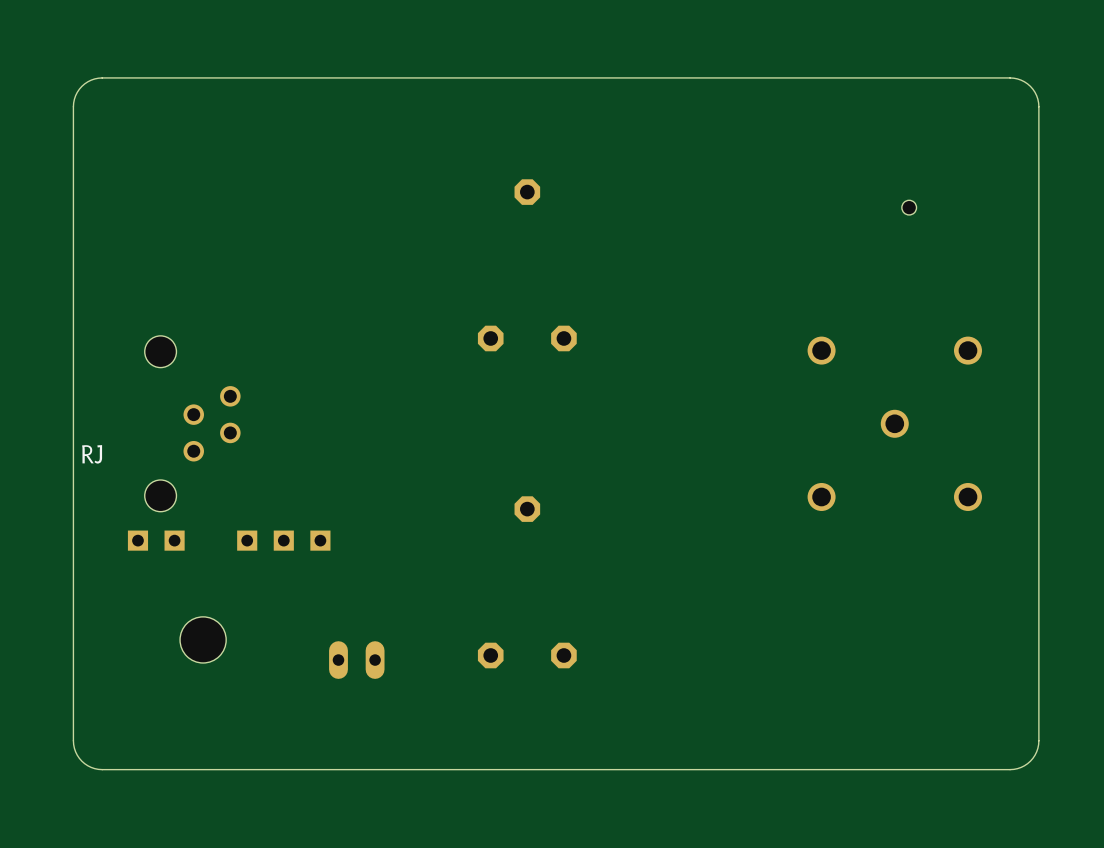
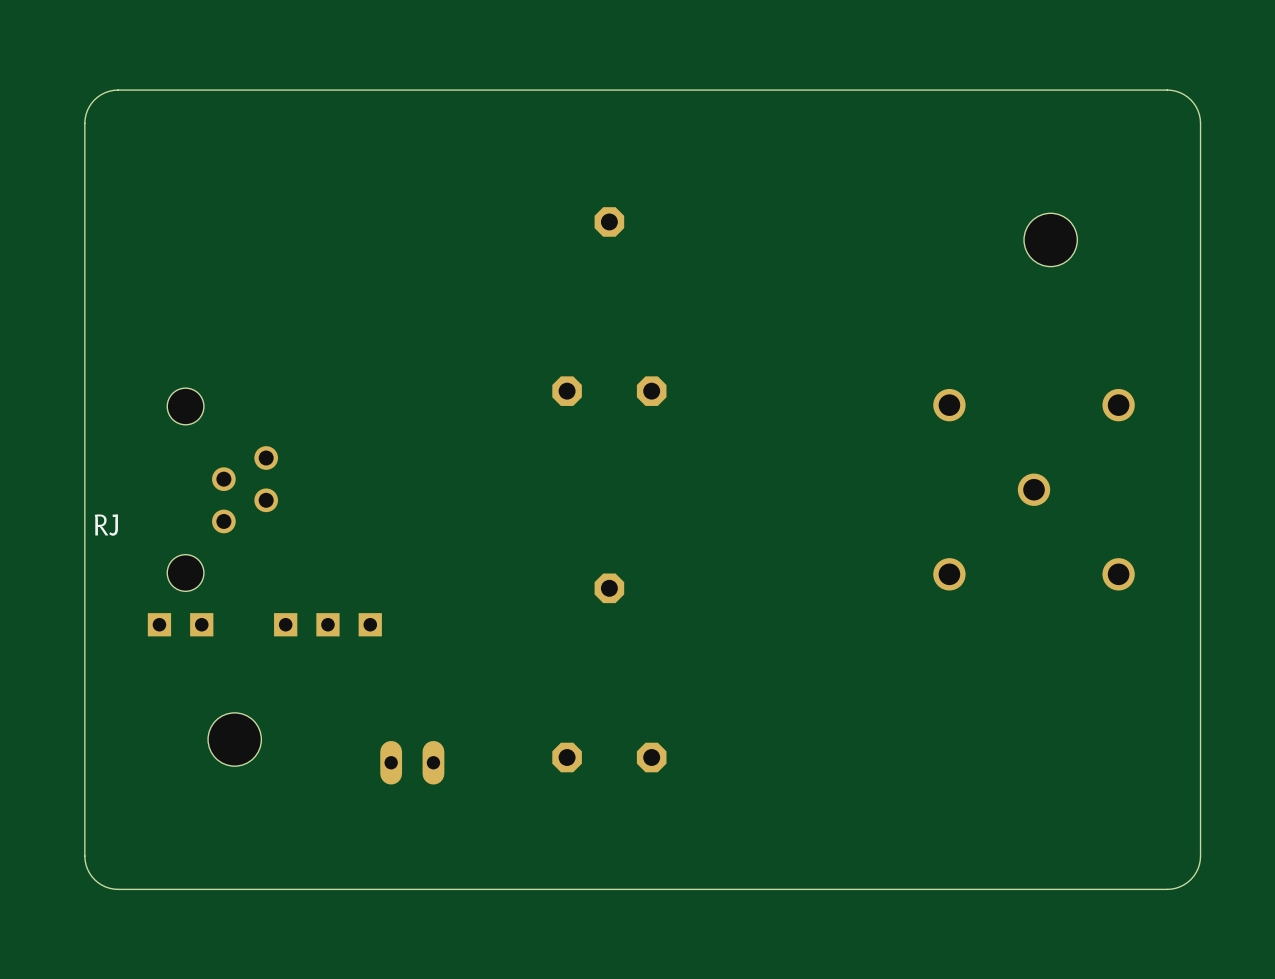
hole size: [901, 200, 917, 215] -> [1024, 213, 1078, 267]

